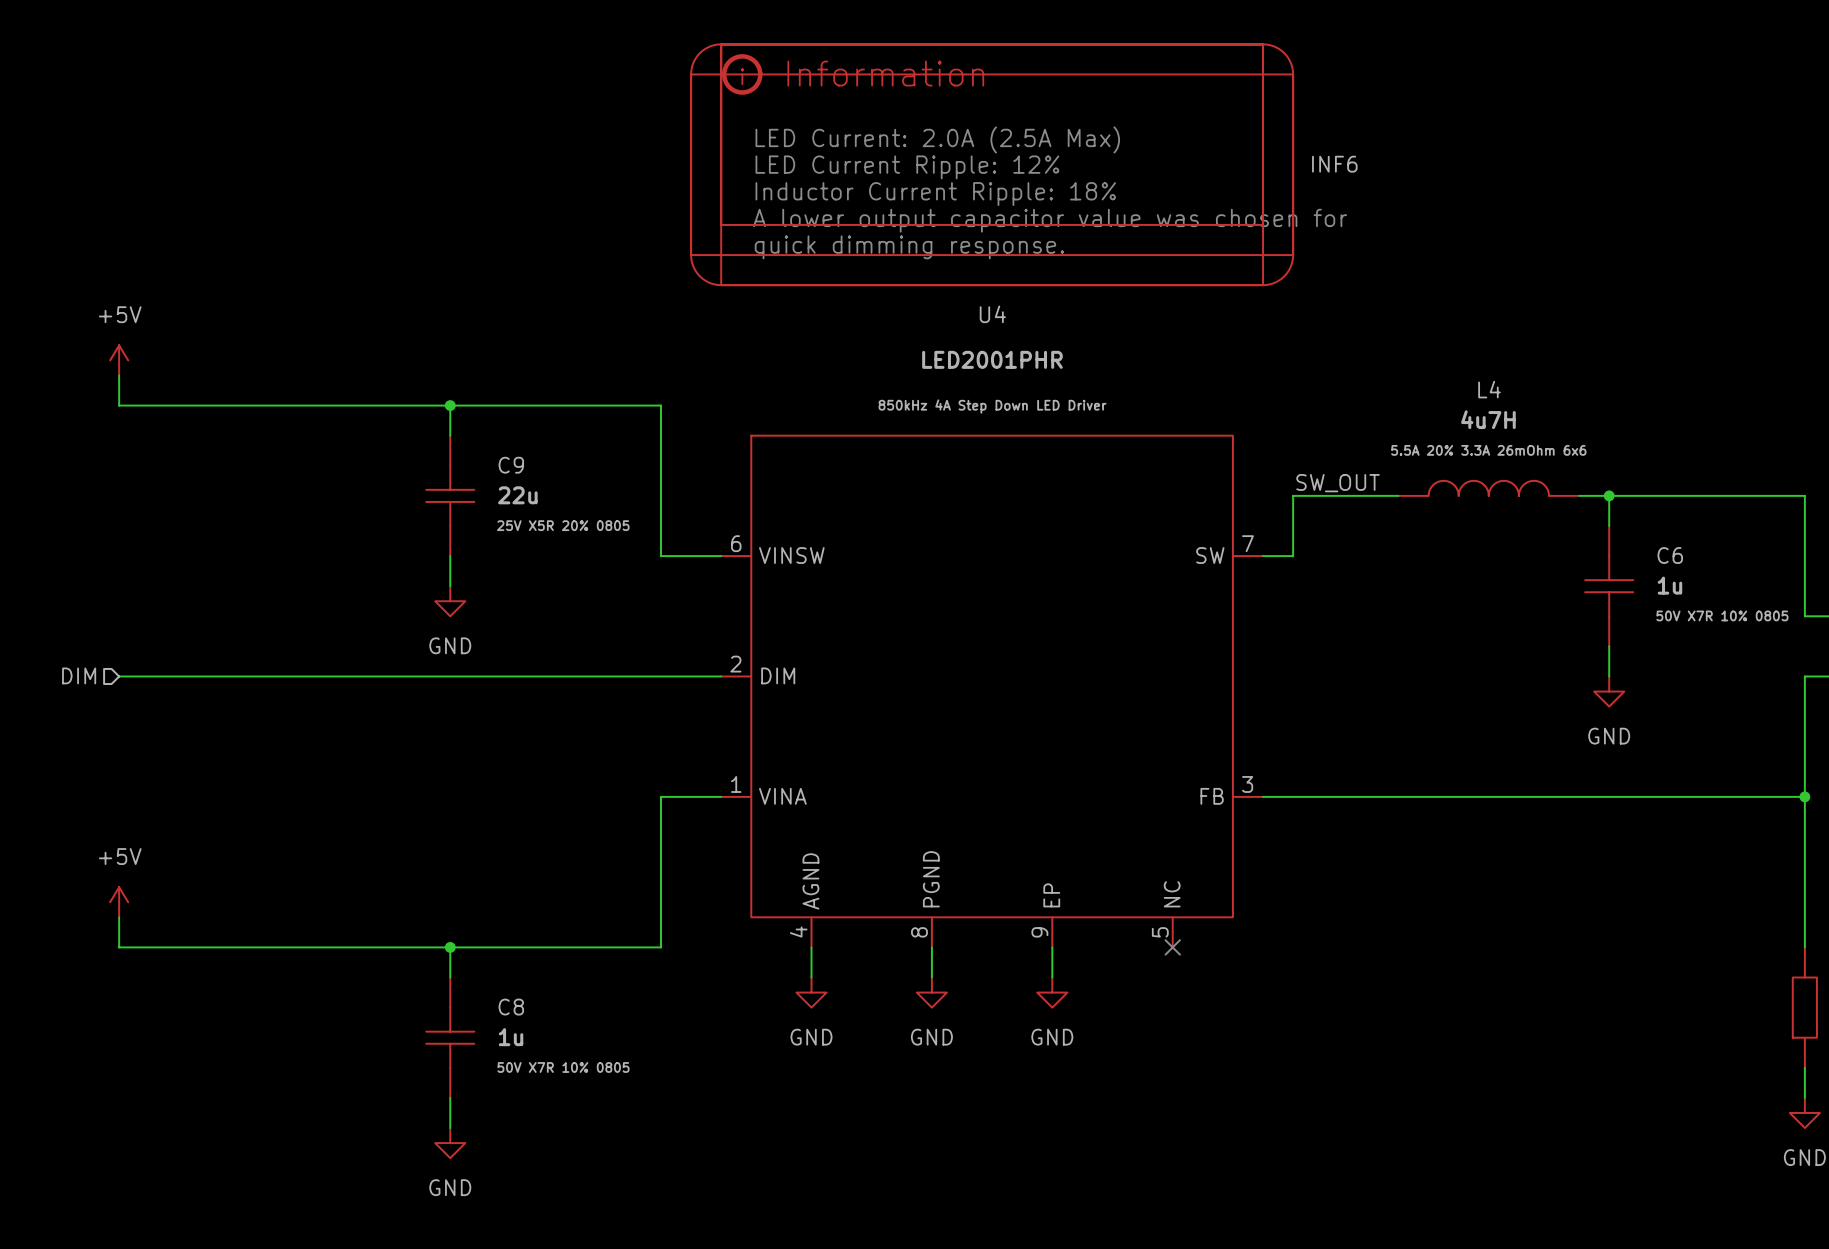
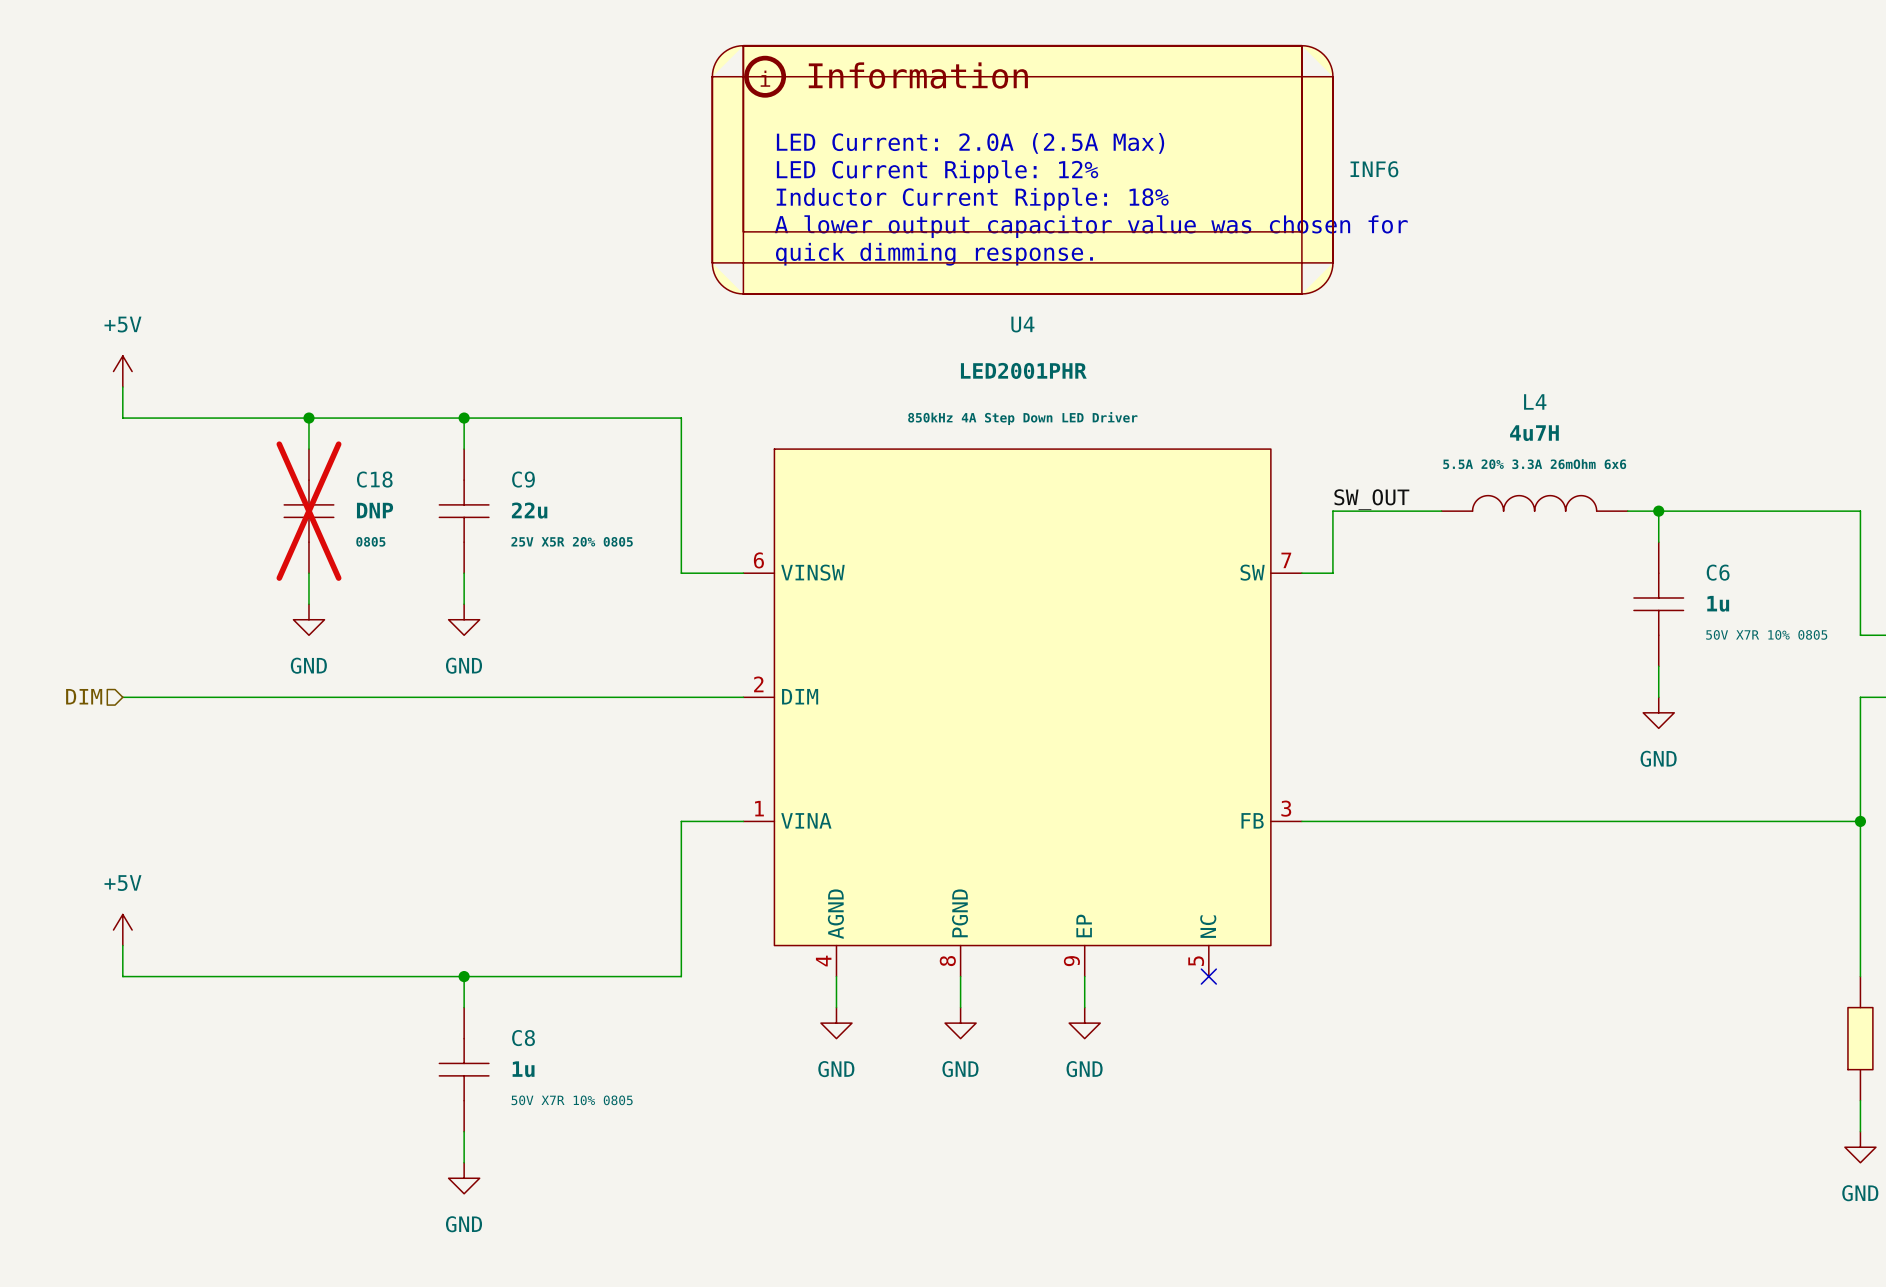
wire: none -> (308, 418) (308, 449)
junction: none -> (308, 418)
C18: none -> DNP (308, 511)
wire: none -> (308, 573) (308, 604)
power symbol: none -> GND (308, 619)

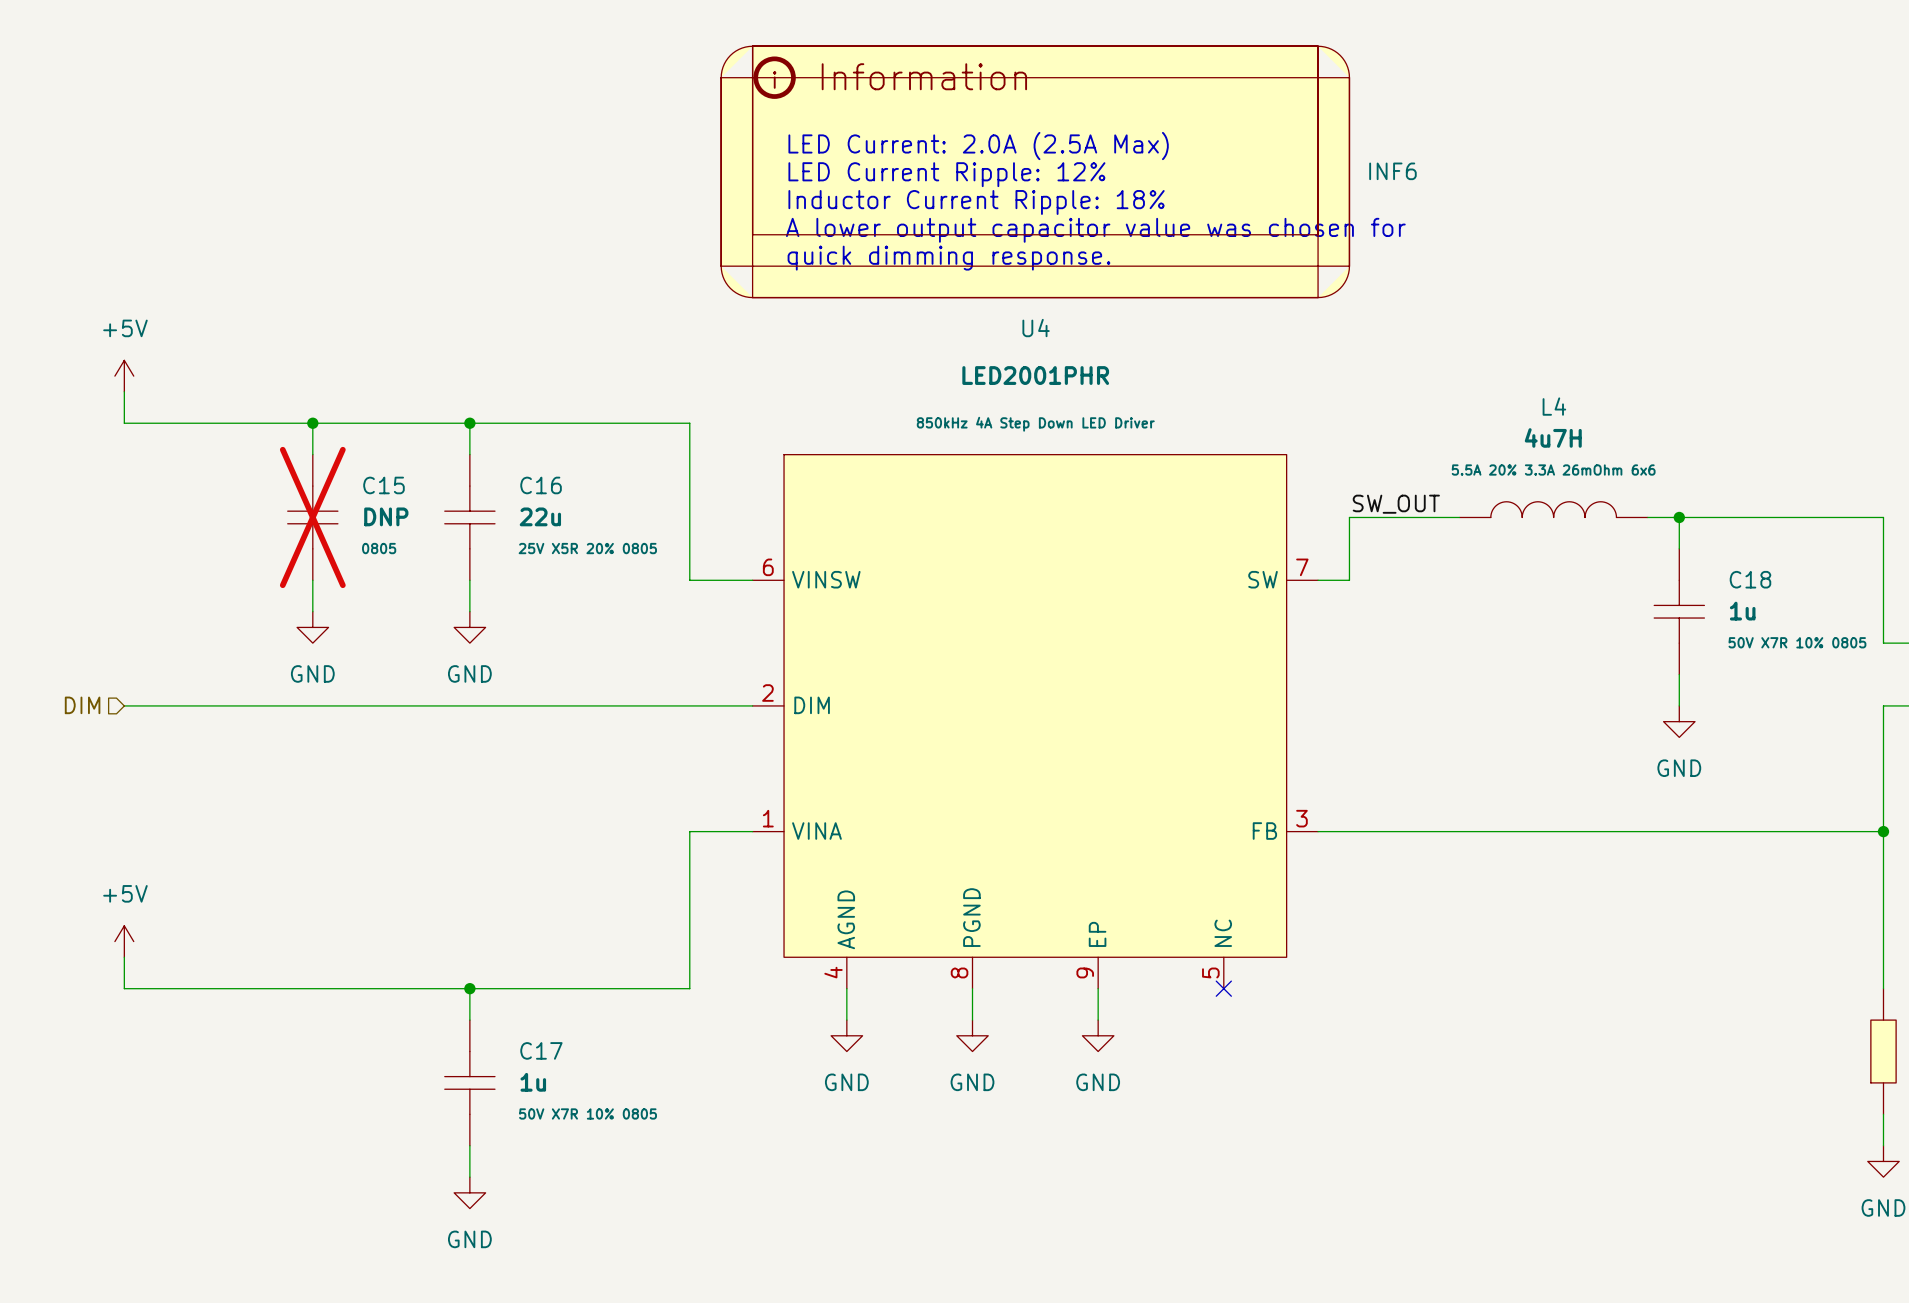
C18 name: C18 (374, 479) -> C15 (383, 485)
C9 name: C9 (523, 479) -> C16 (541, 485)
C6 name: C6 (1718, 572) -> C18 (1750, 579)
C8 name: C8 (523, 1038) -> C17 (541, 1050)

